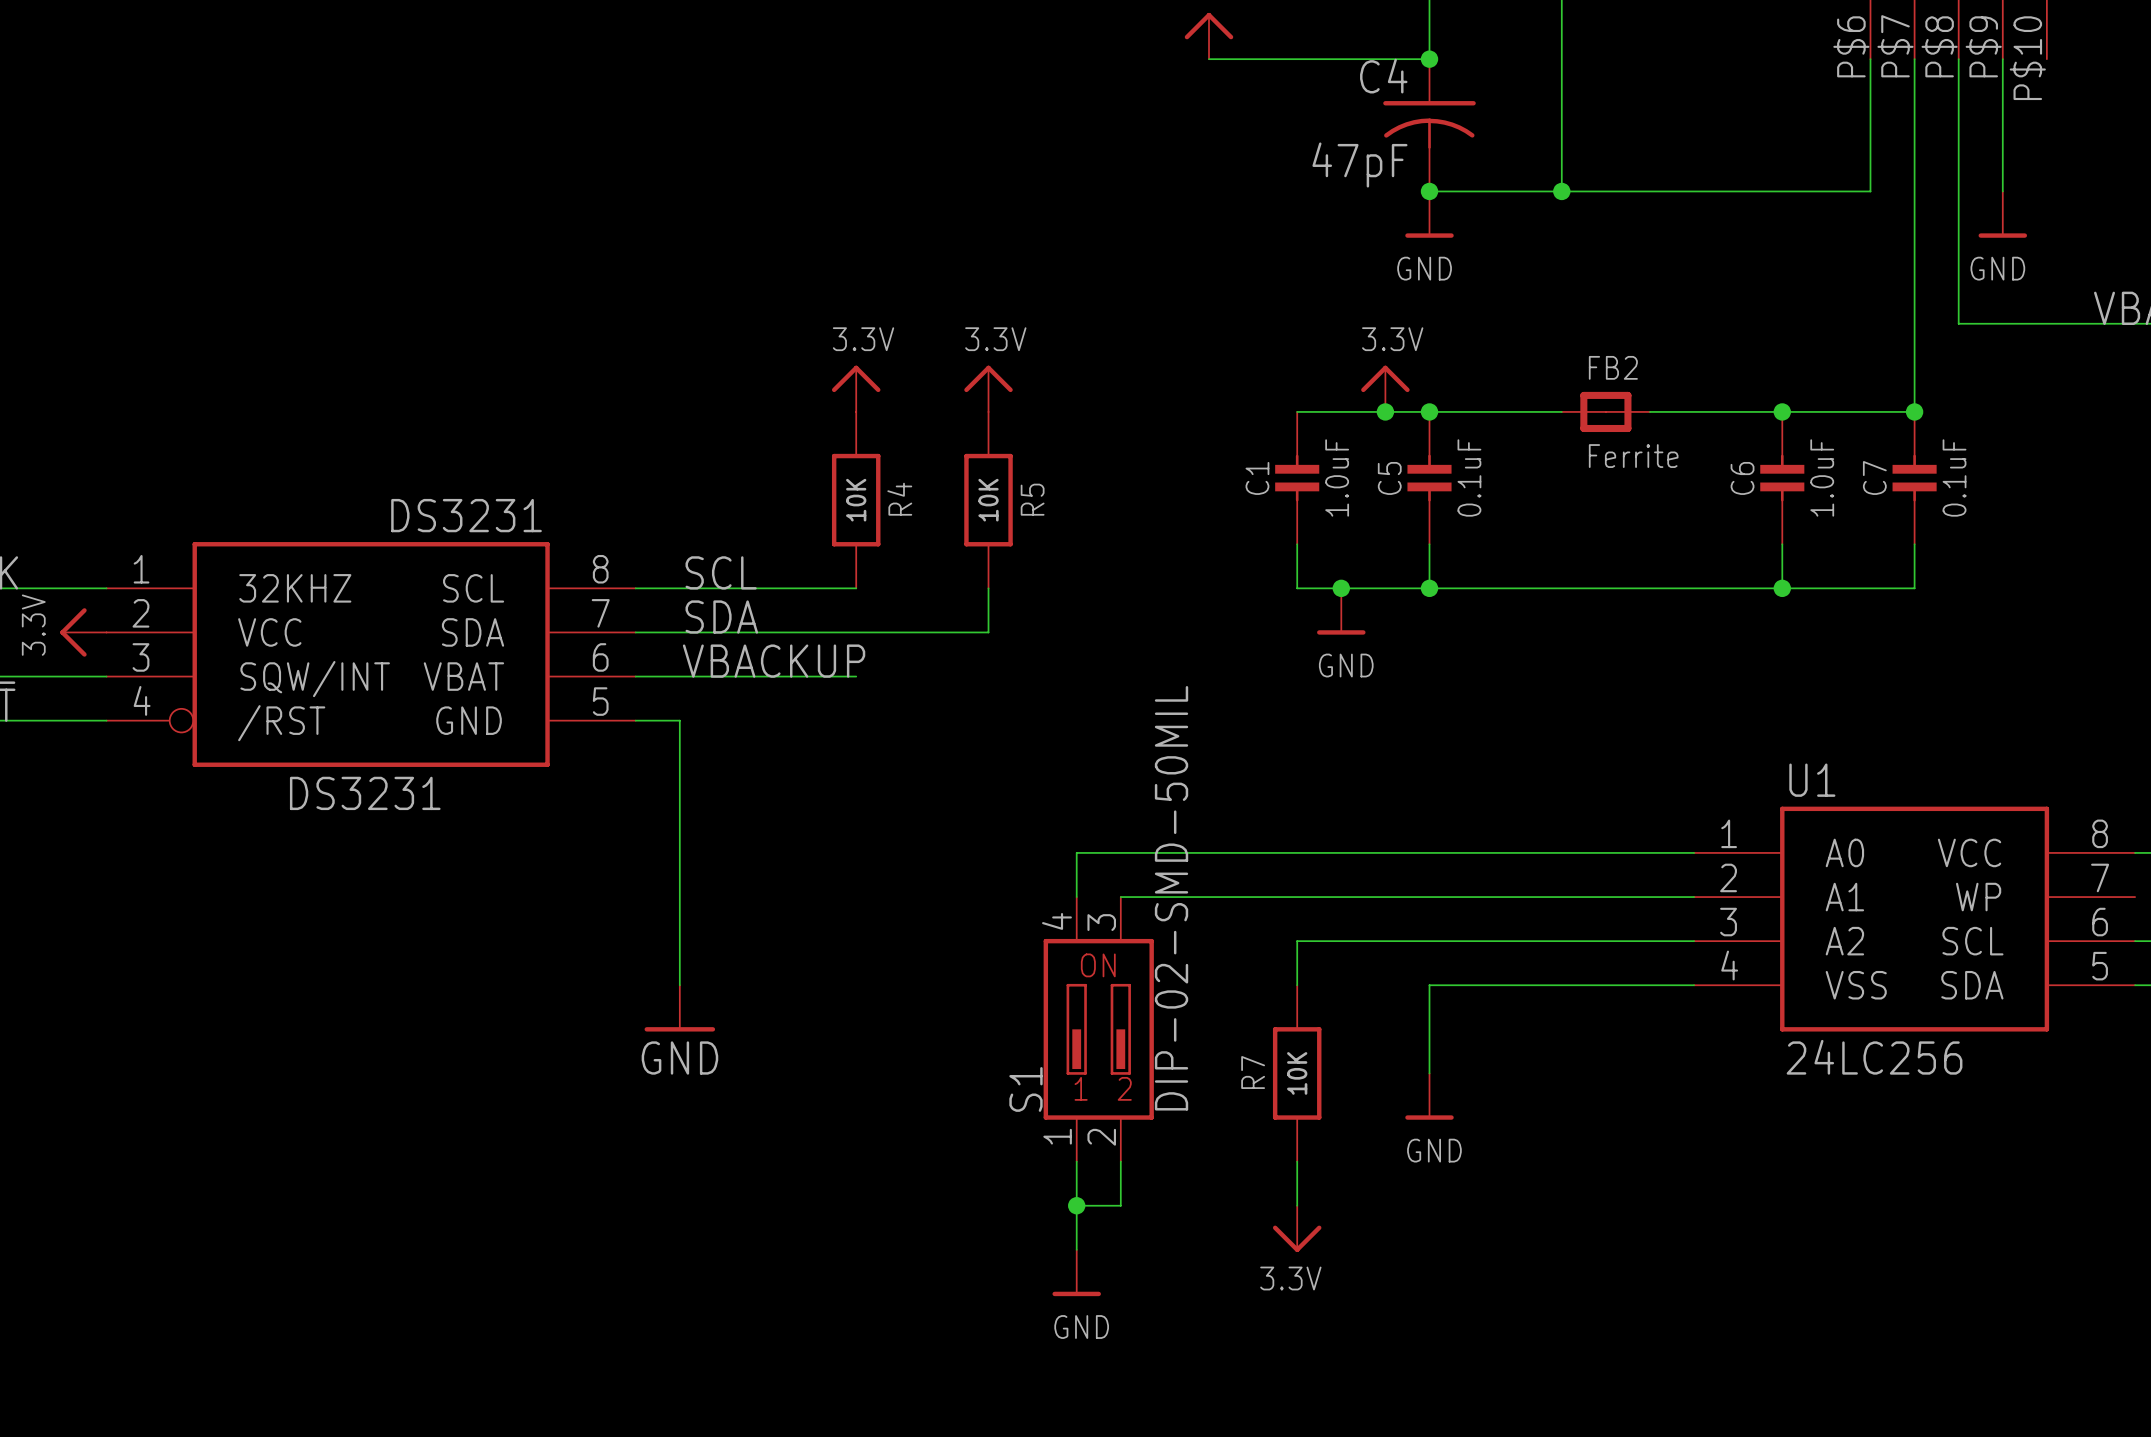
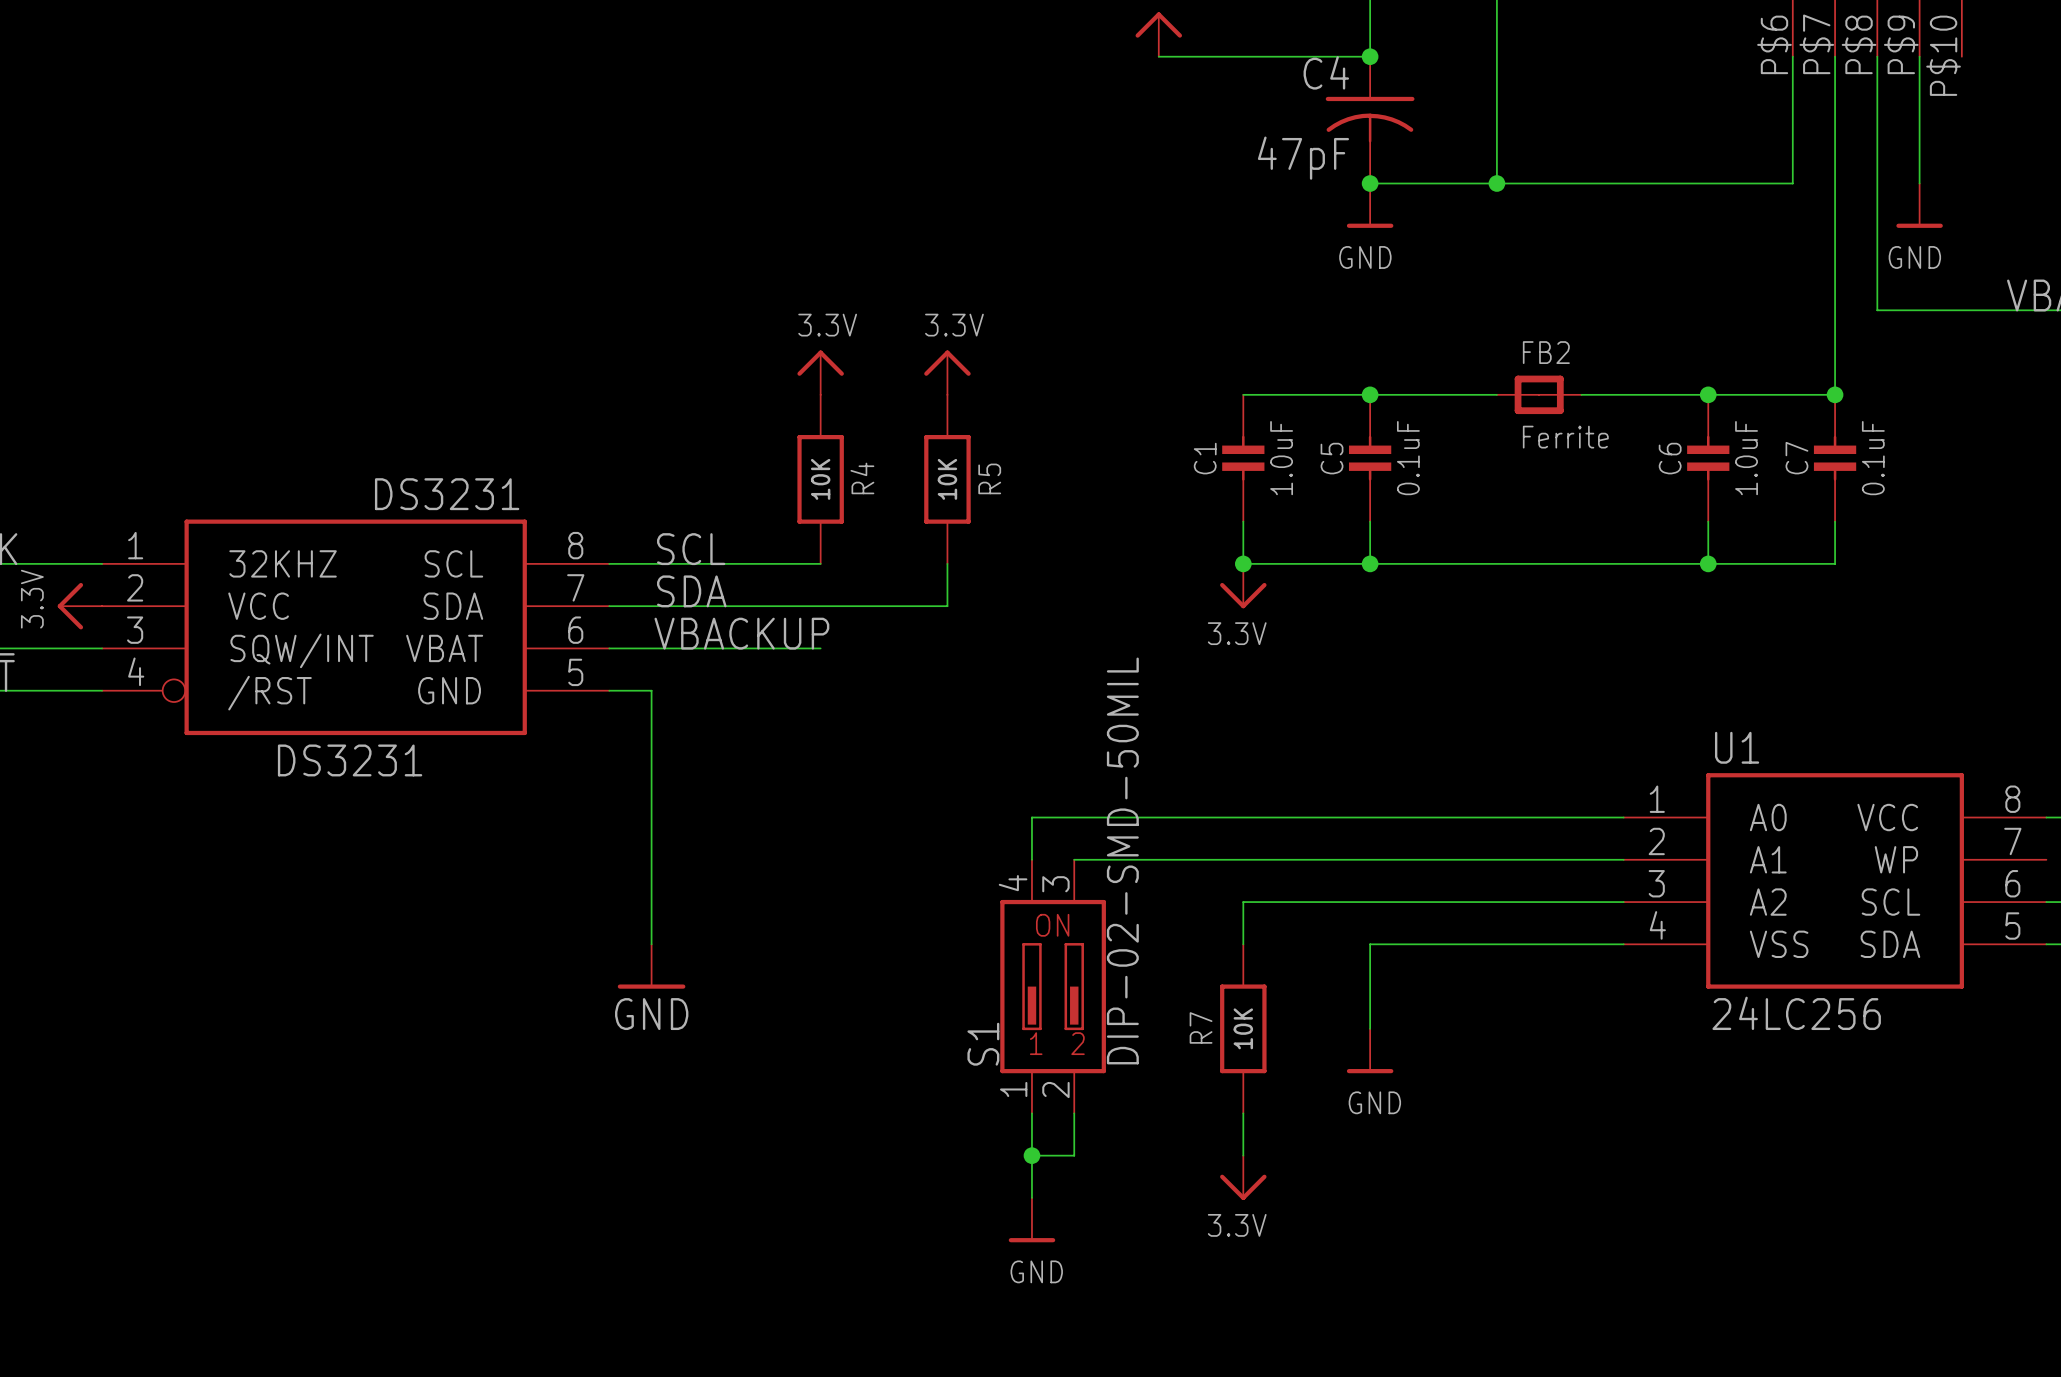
power symbol rotation: 0° (1385, 378) -> 180° (1243, 595)
power symbol position: 3.3V (1385, 388) -> 3.3V (1243, 586)
junction: (1385, 411) -> none
junction position: (1341, 588) -> (1243, 563)
power symbol: GND (1341, 611) -> none

